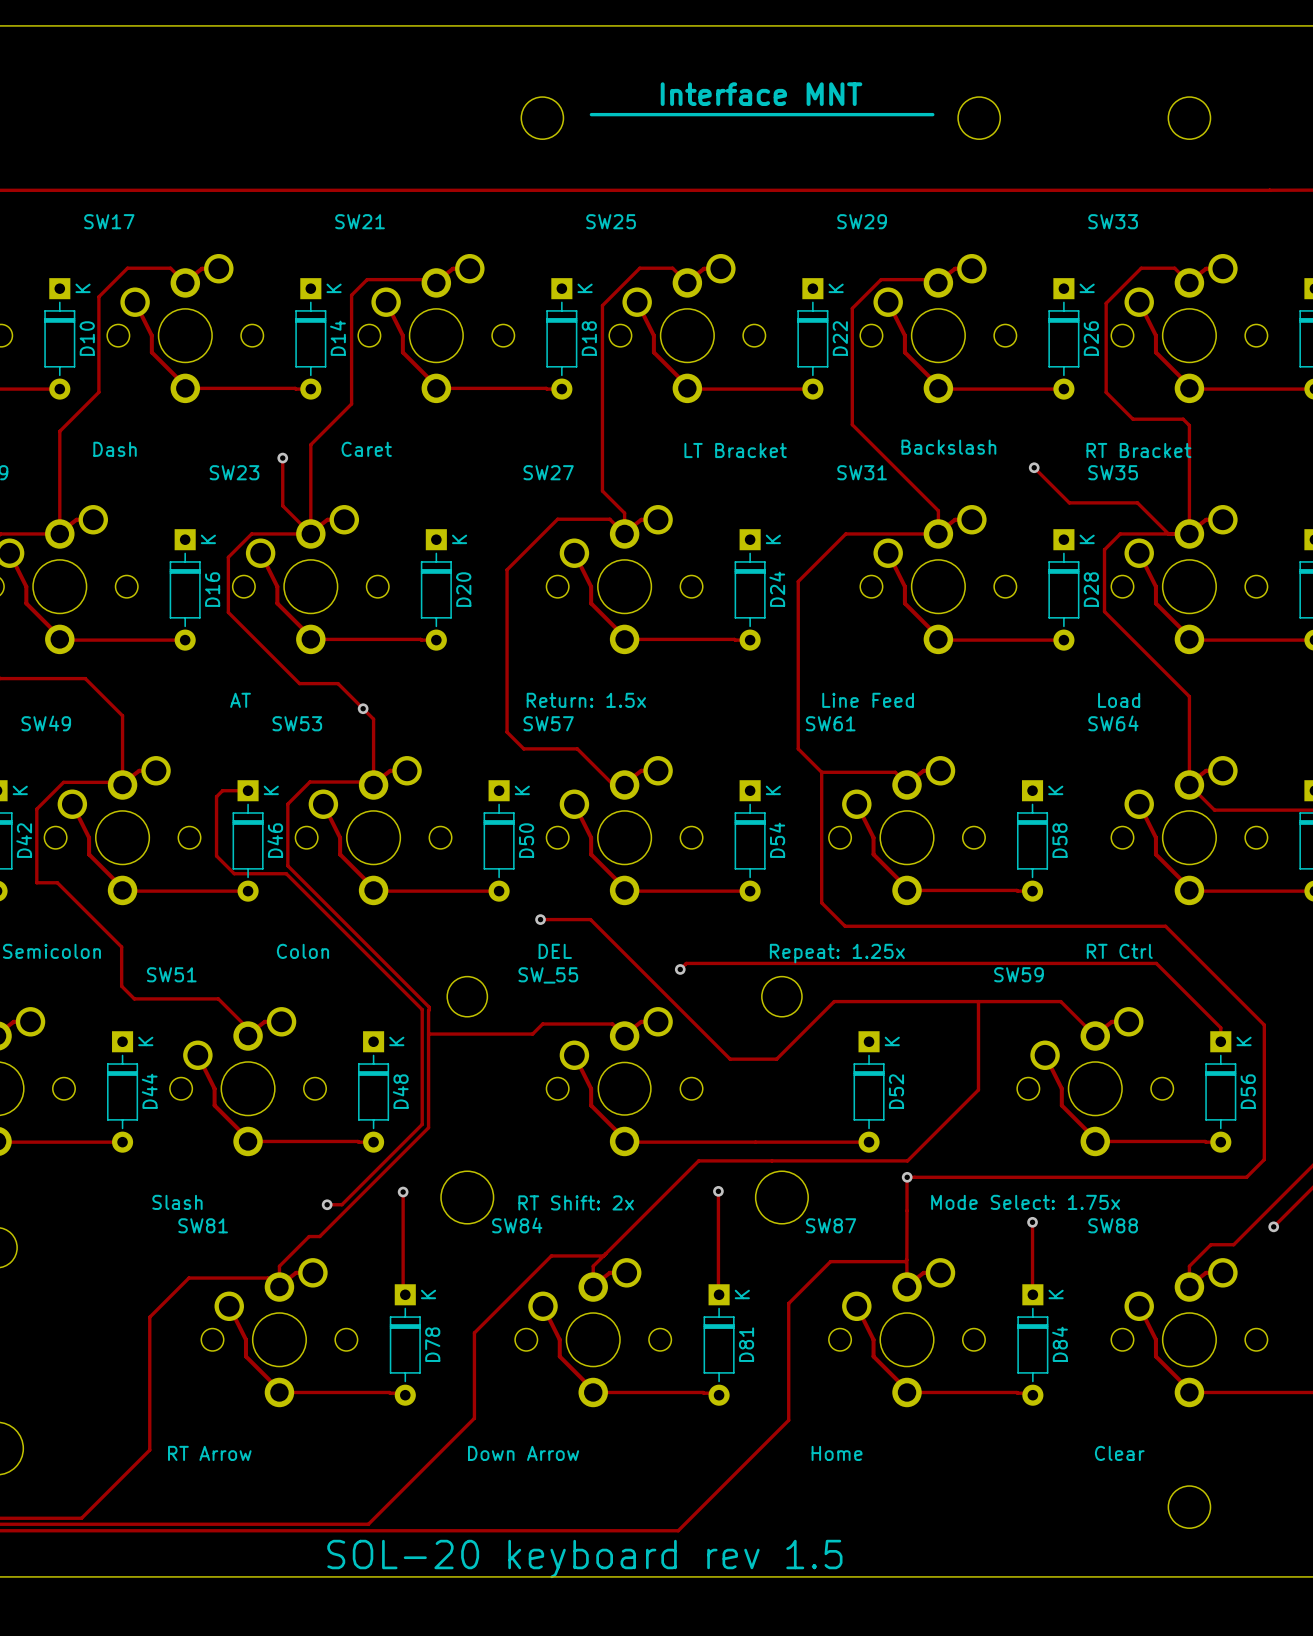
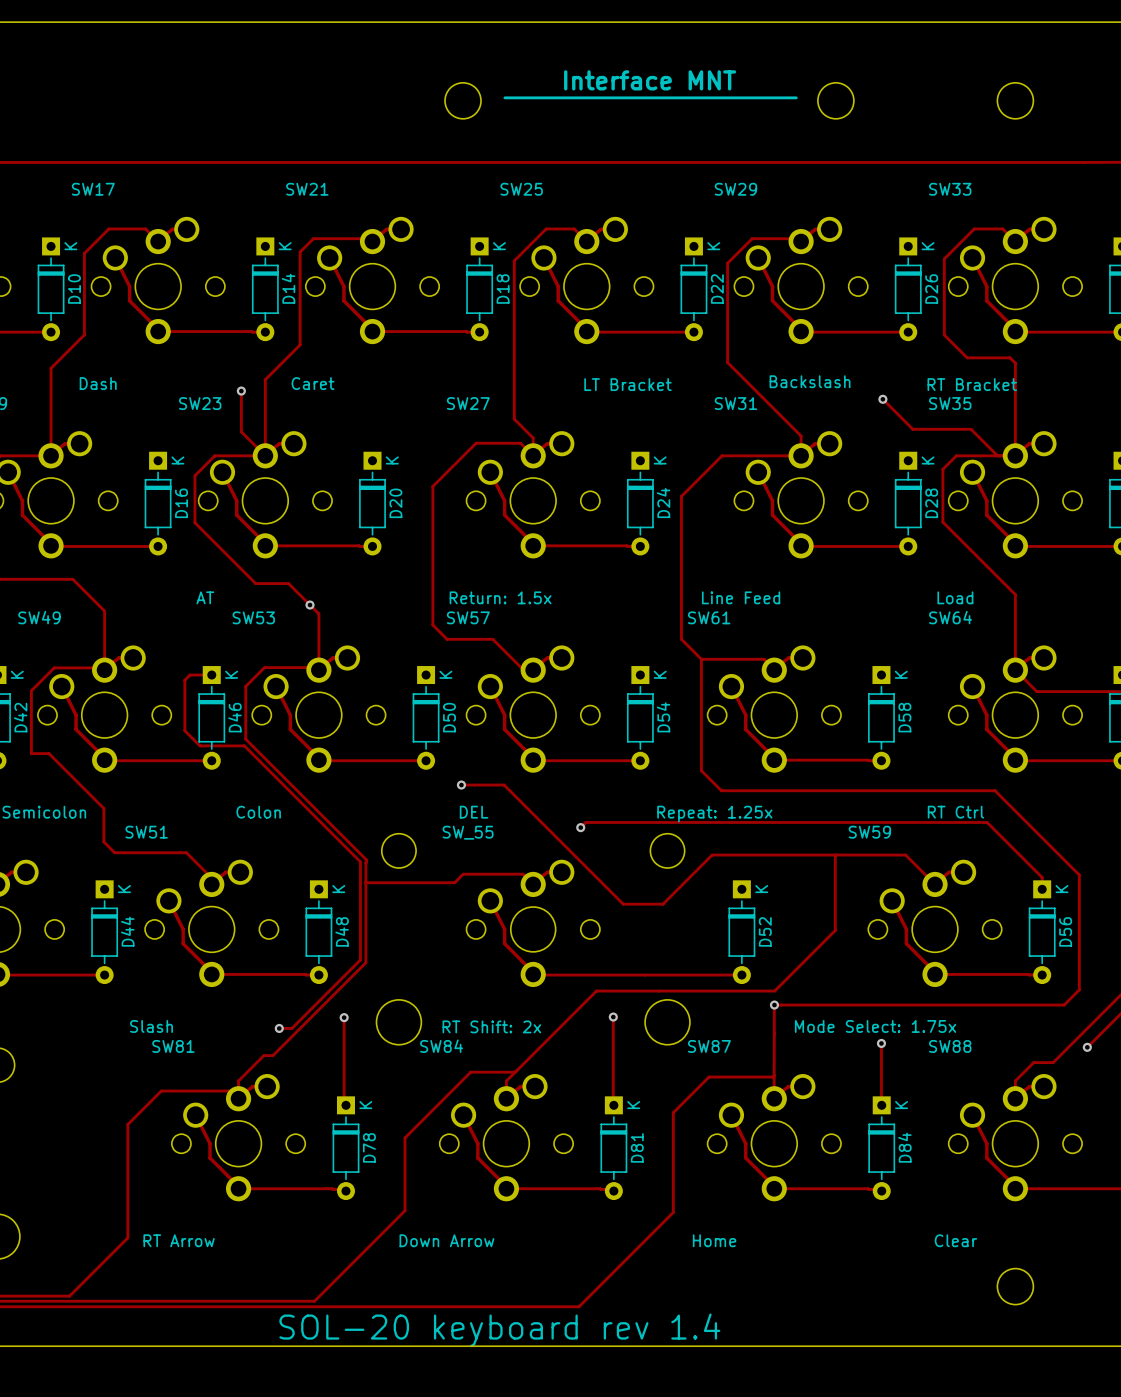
text: SOL-20 keyboard rev 1.5 (584, 1558) -> SOL-20 keyboard rev 1.4 (499, 1330)

